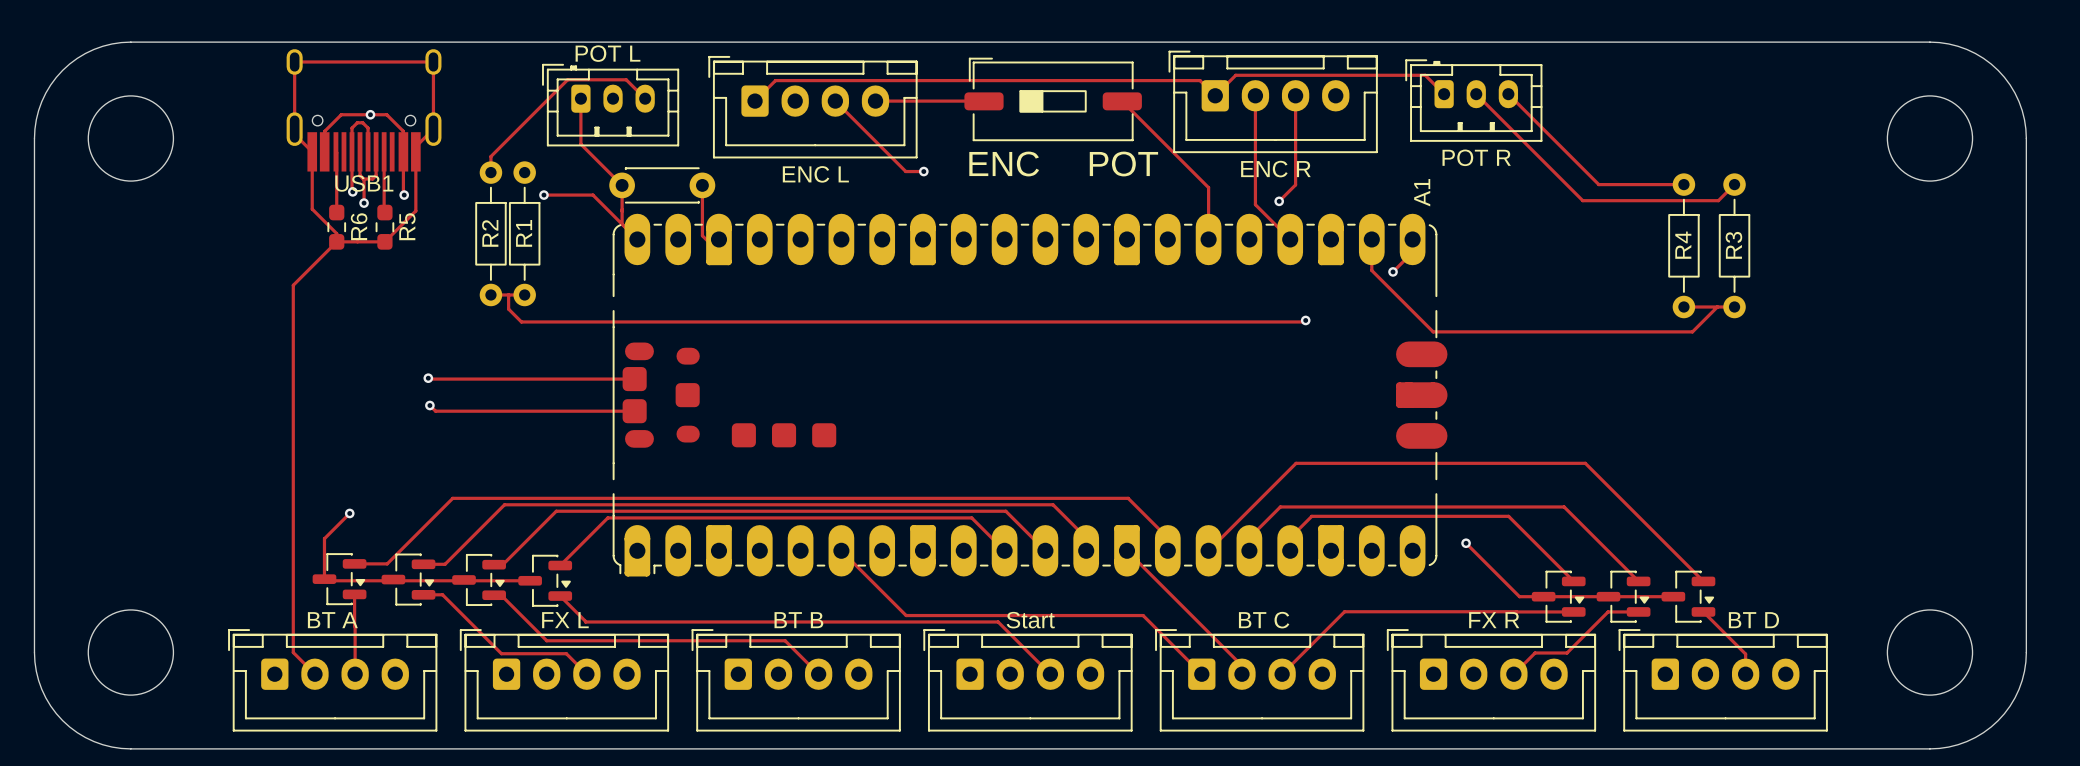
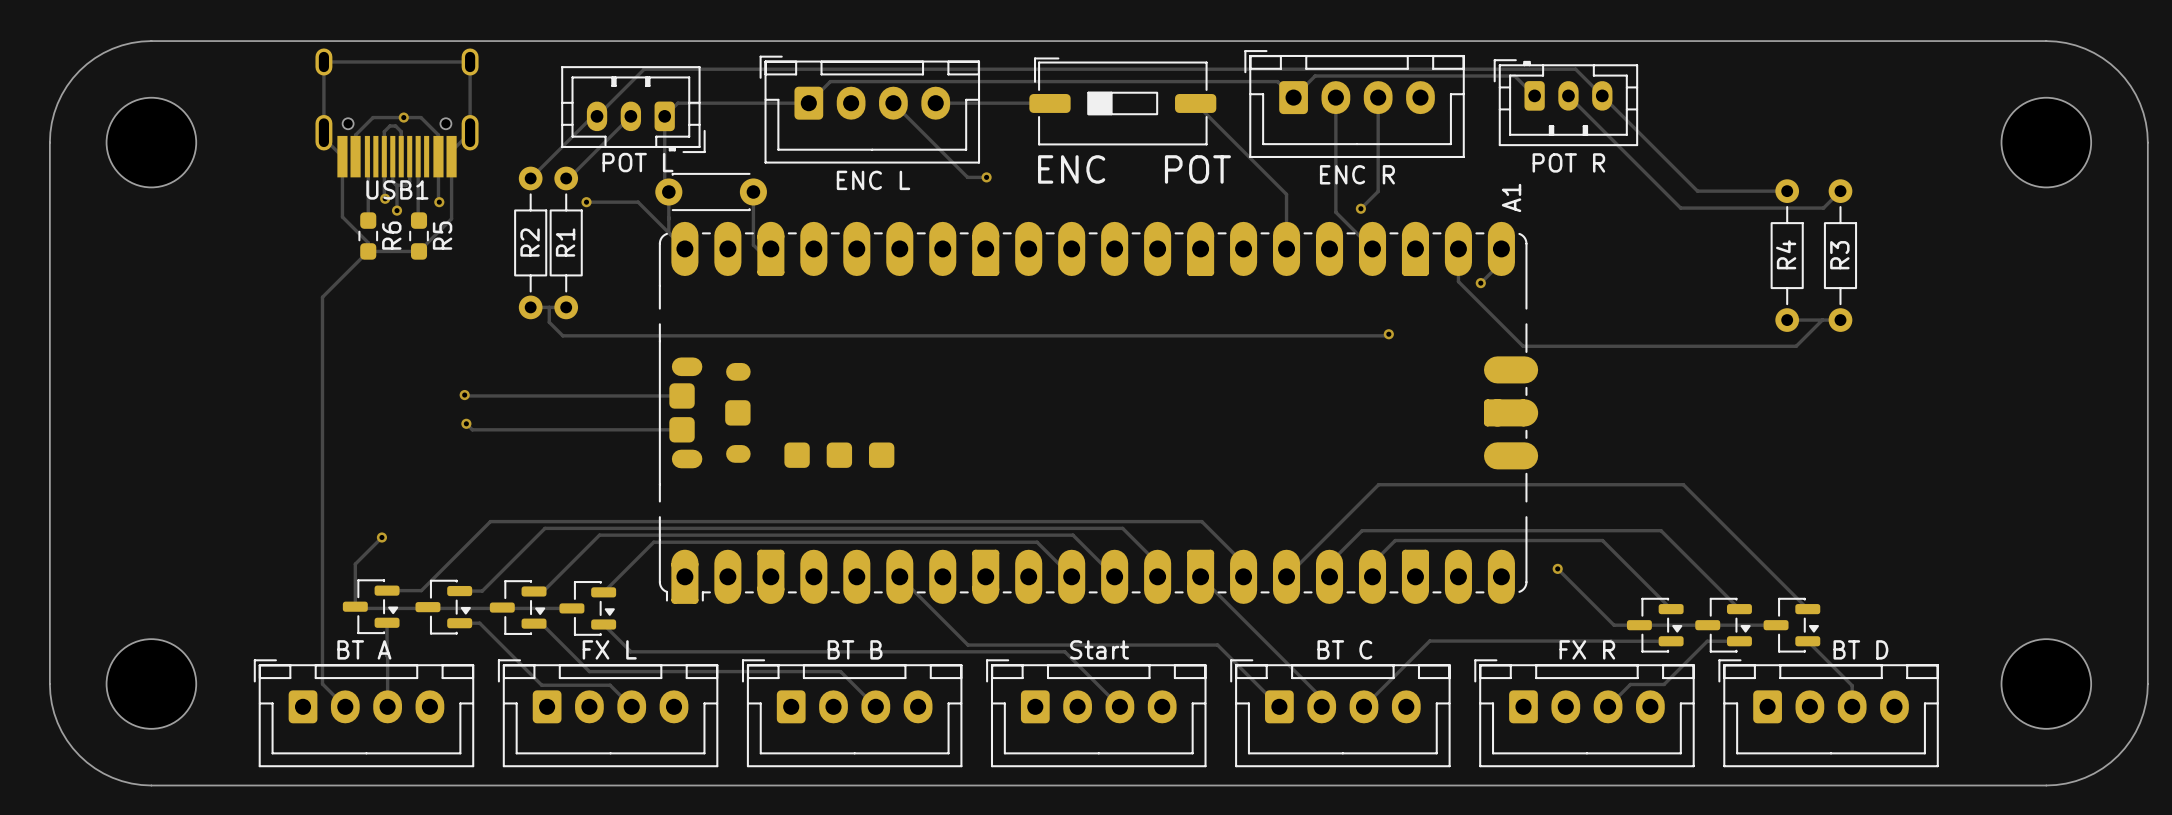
track: (580, 98) (580, 144) (618, 181) -> (808, 103) (677, 103) (664, 116) (664, 187)
track: (645, 98) (626, 79) (567, 79) (490, 156) (490, 172) -> (1602, 95) (1575, 69) (644, 69) (597, 116) (592, 116) (530, 178)
part rotation: 0° (610, 105) -> 180° (633, 109)
track: none -> (630, 116) (572, 174) (566, 178)

